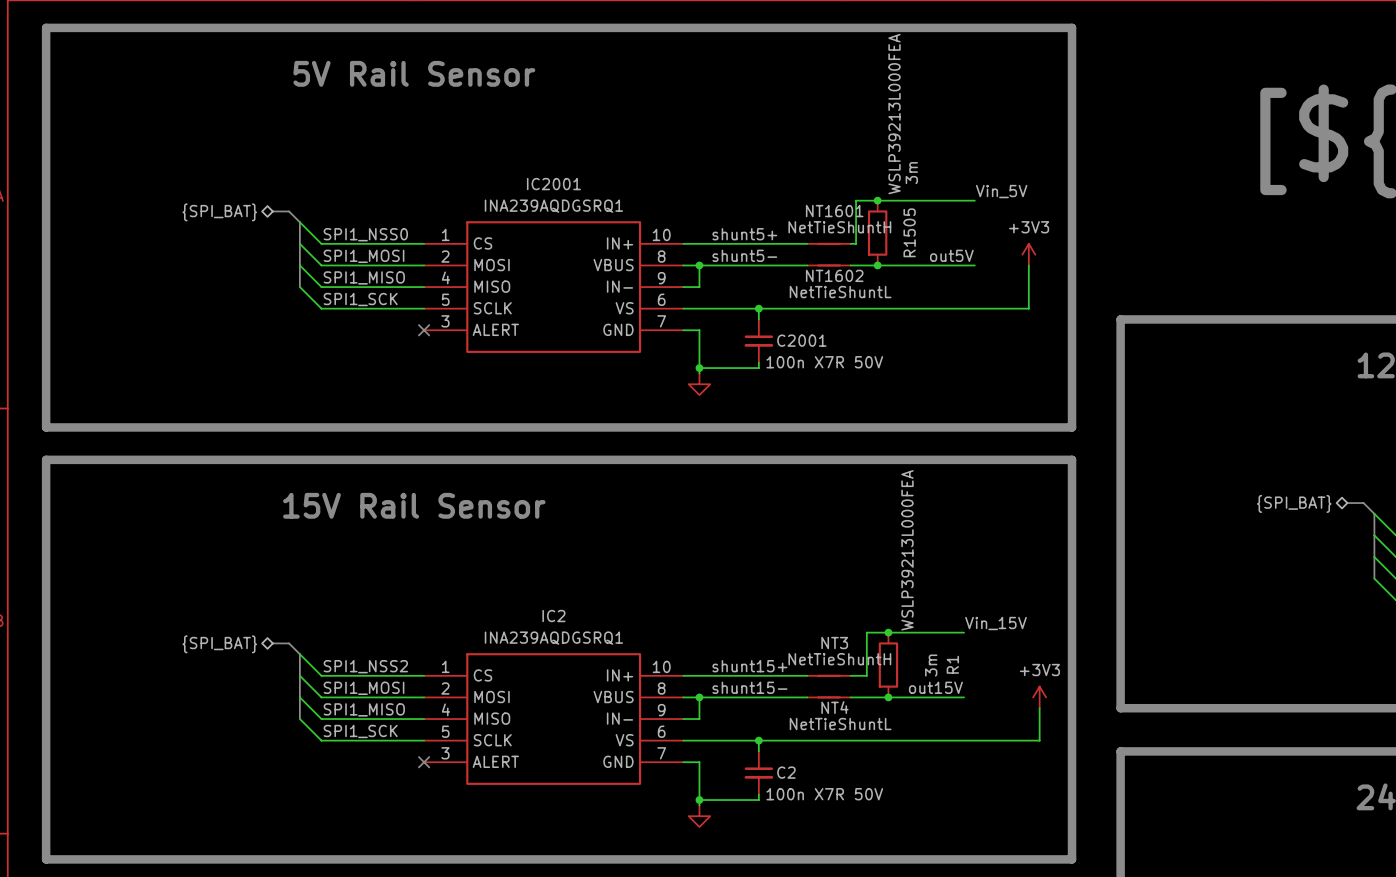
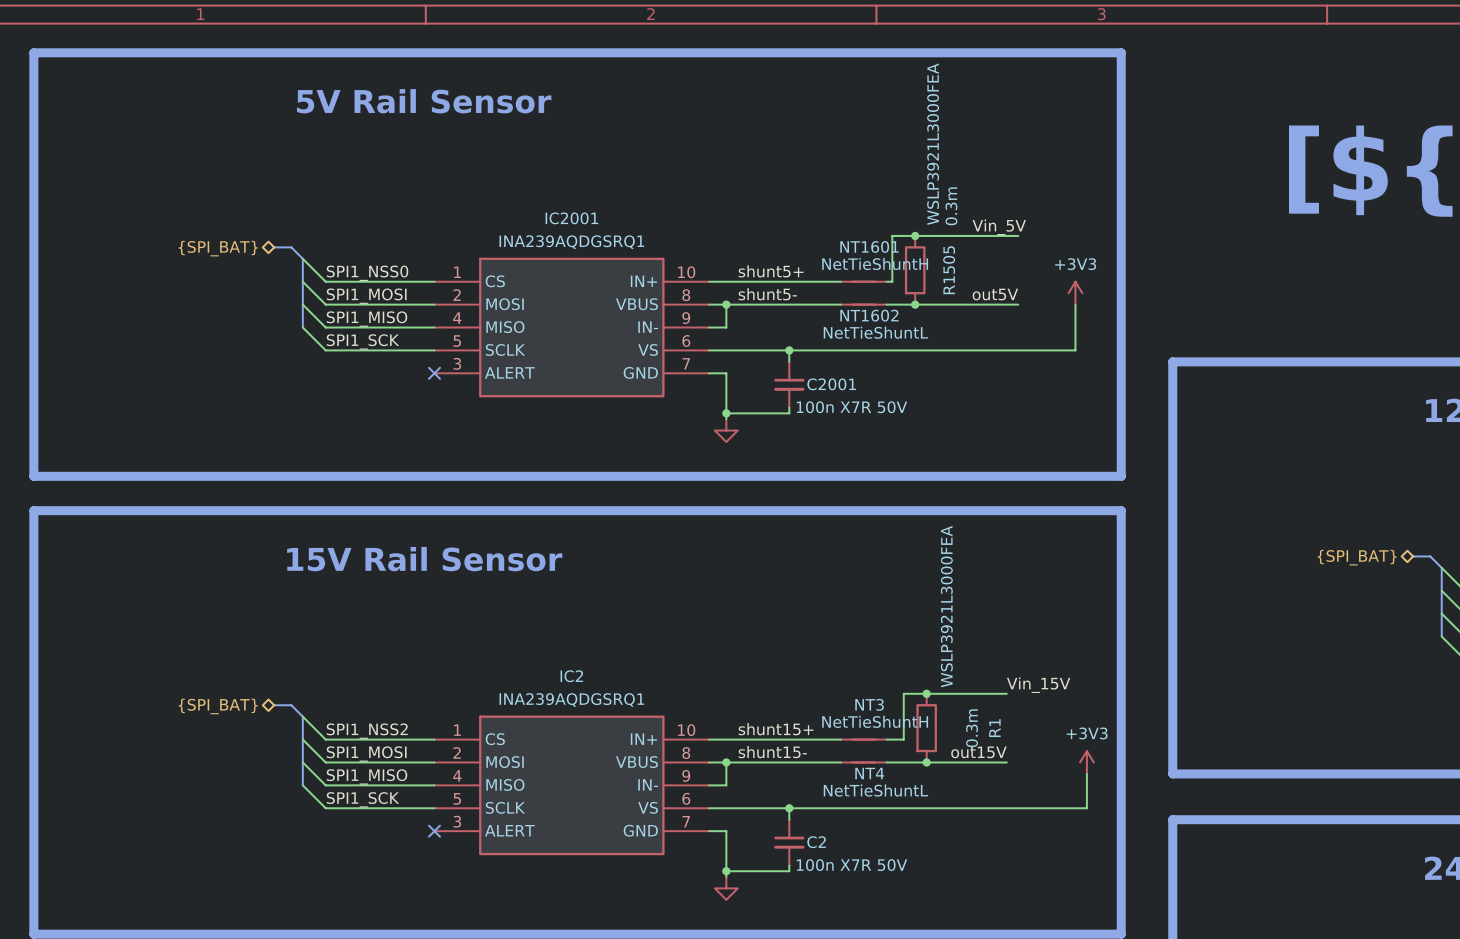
R1505 text: WSLP39213L000FEA (894, 114) -> WSLP3921L3000FEA (933, 144)
R1505 value: 3m (911, 173) -> 0.3m (951, 206)
label position: Vin_5V (1001, 191) -> Vin_5V (999, 227)
R1 text: WSLP39213L000FEA (907, 550) -> WSLP3921L3000FEA (946, 606)
R1 value: 3m (931, 665) -> 0.3m (972, 728)

